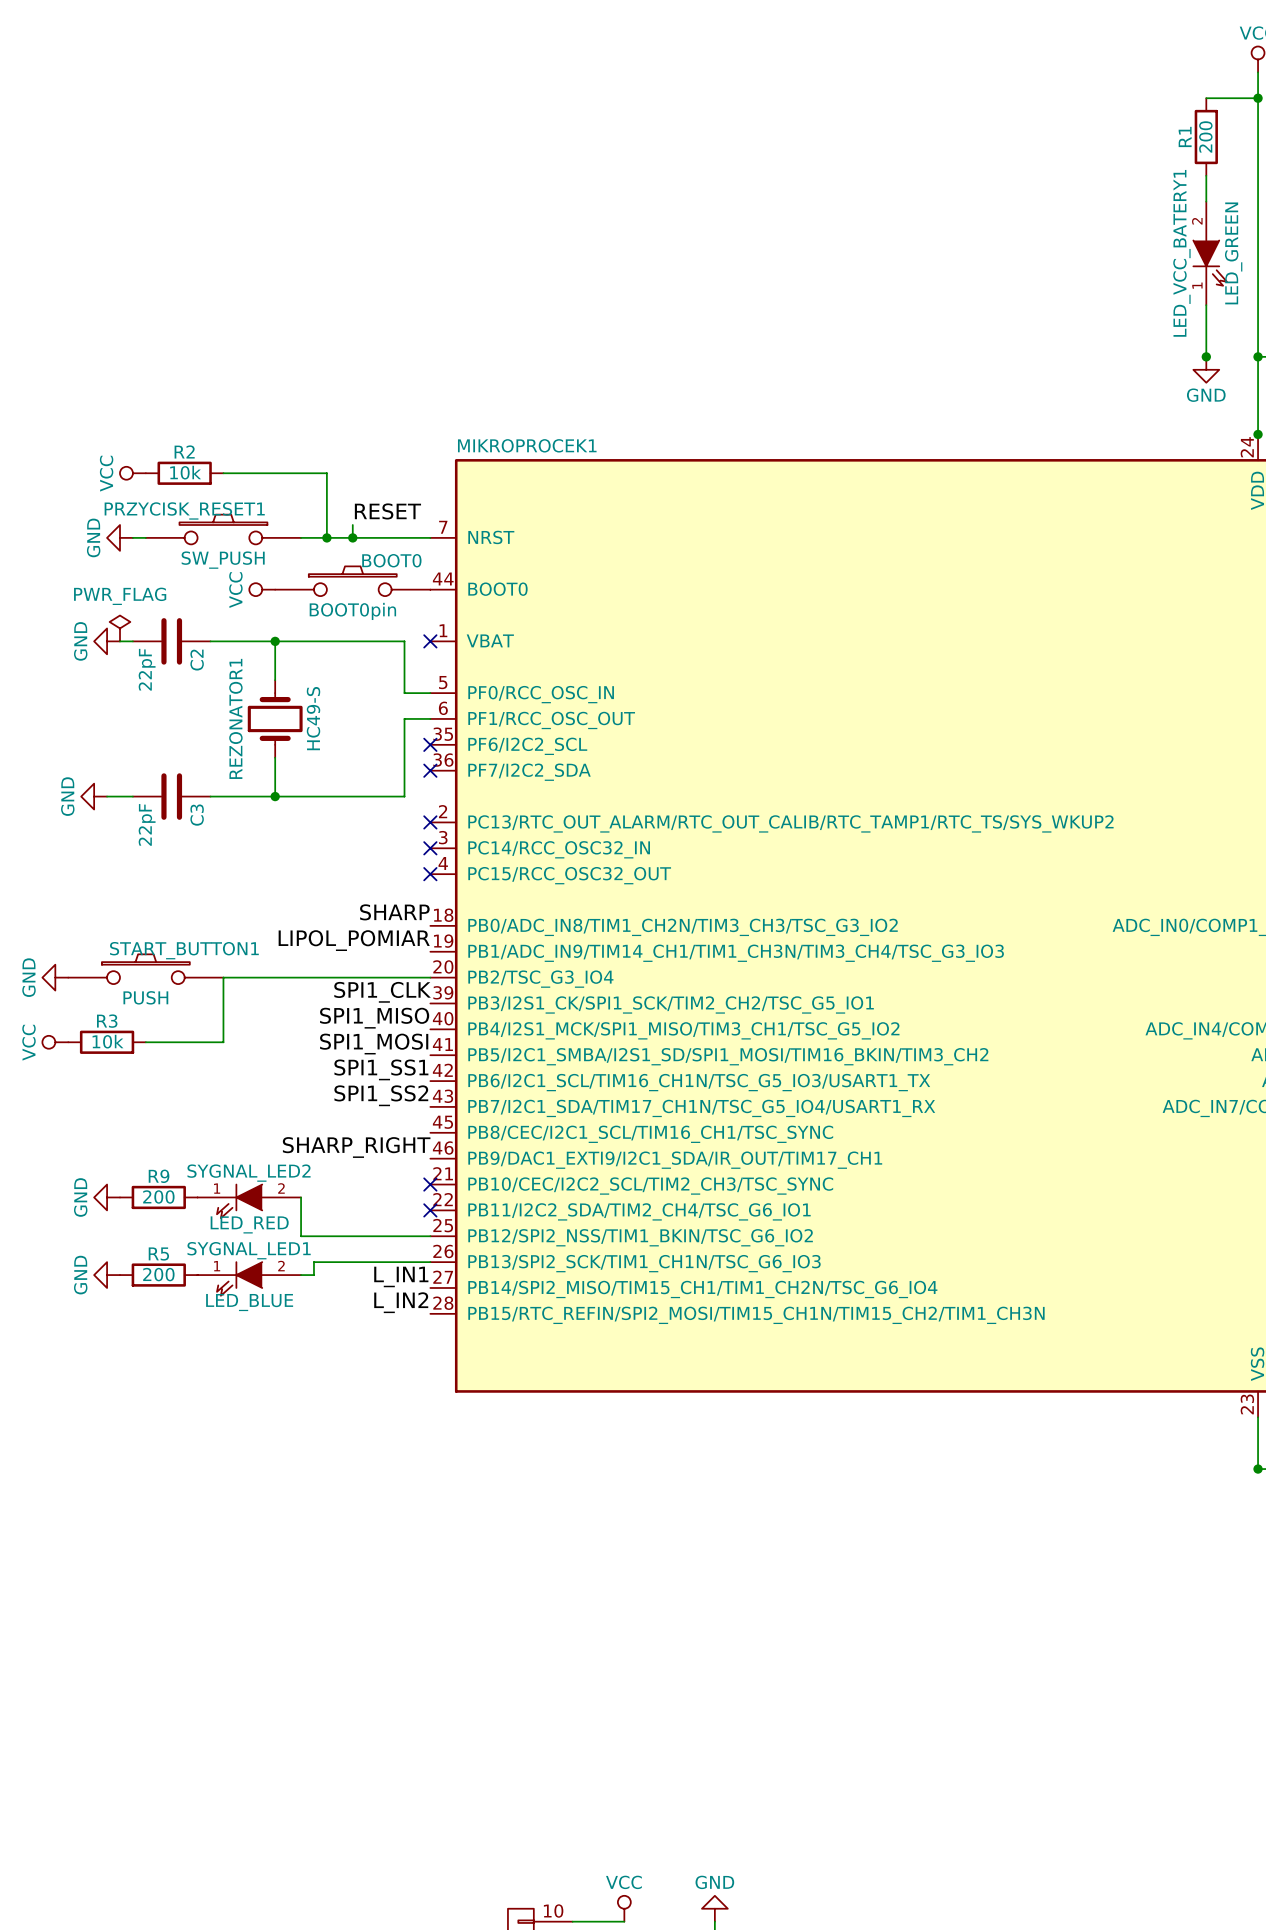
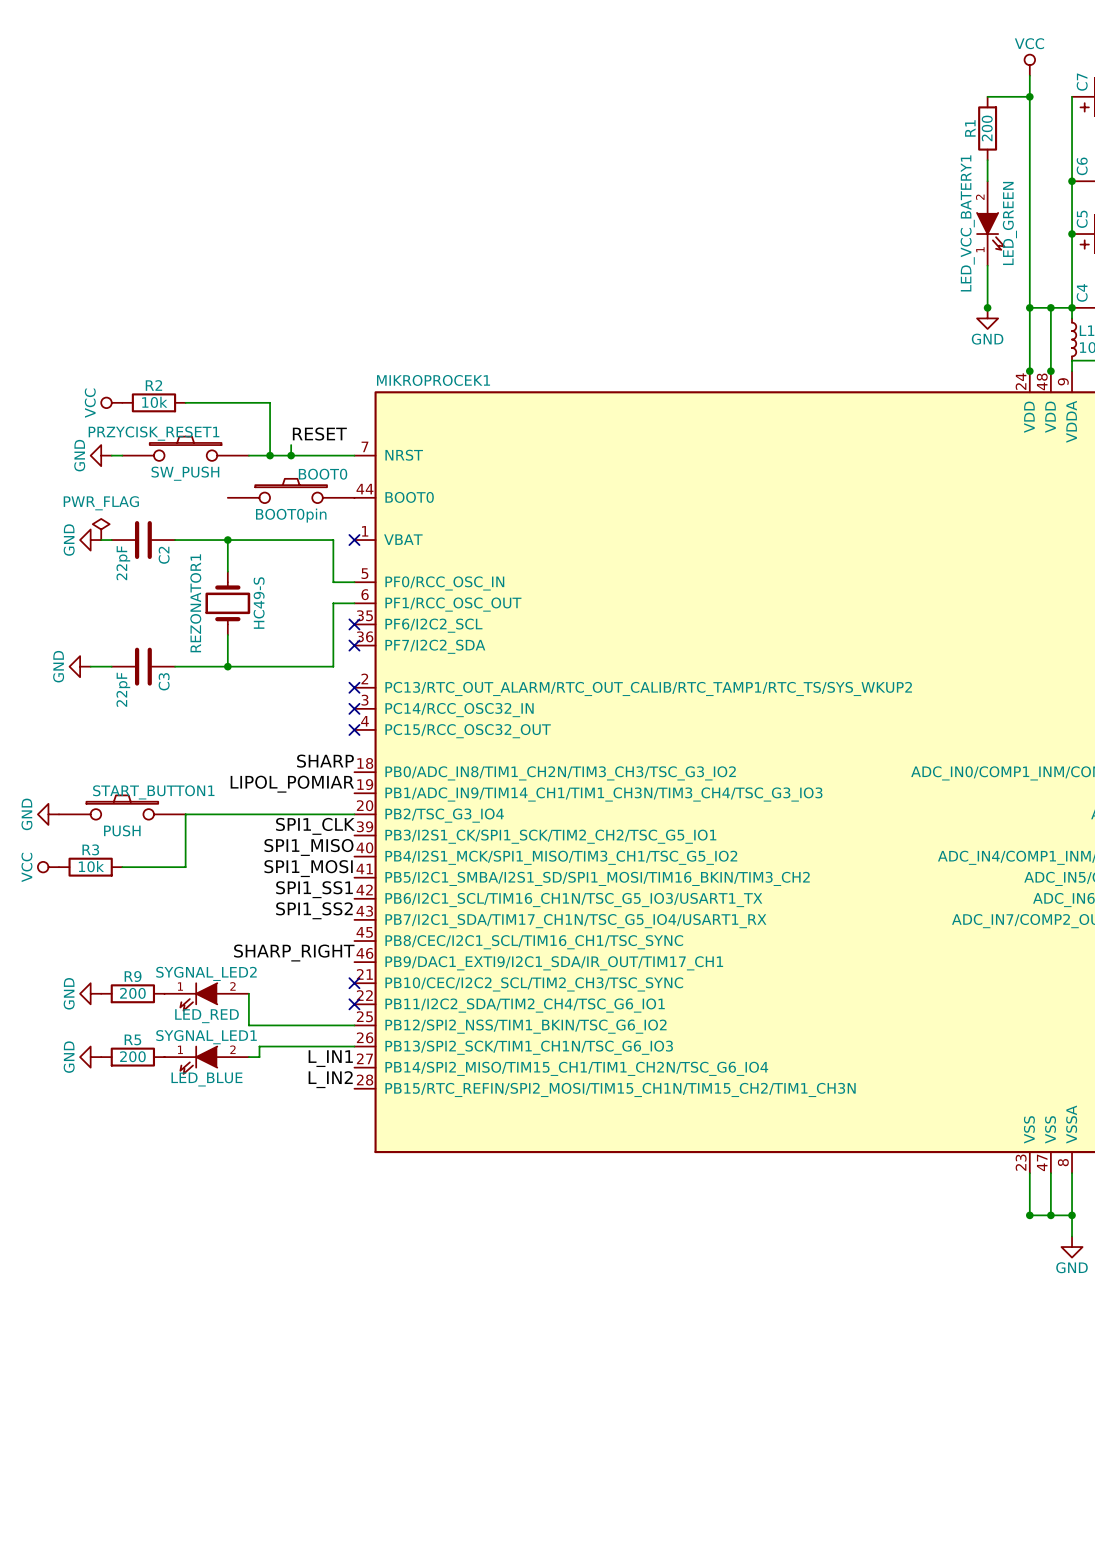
power symbol: VCC (262, 589) -> none

